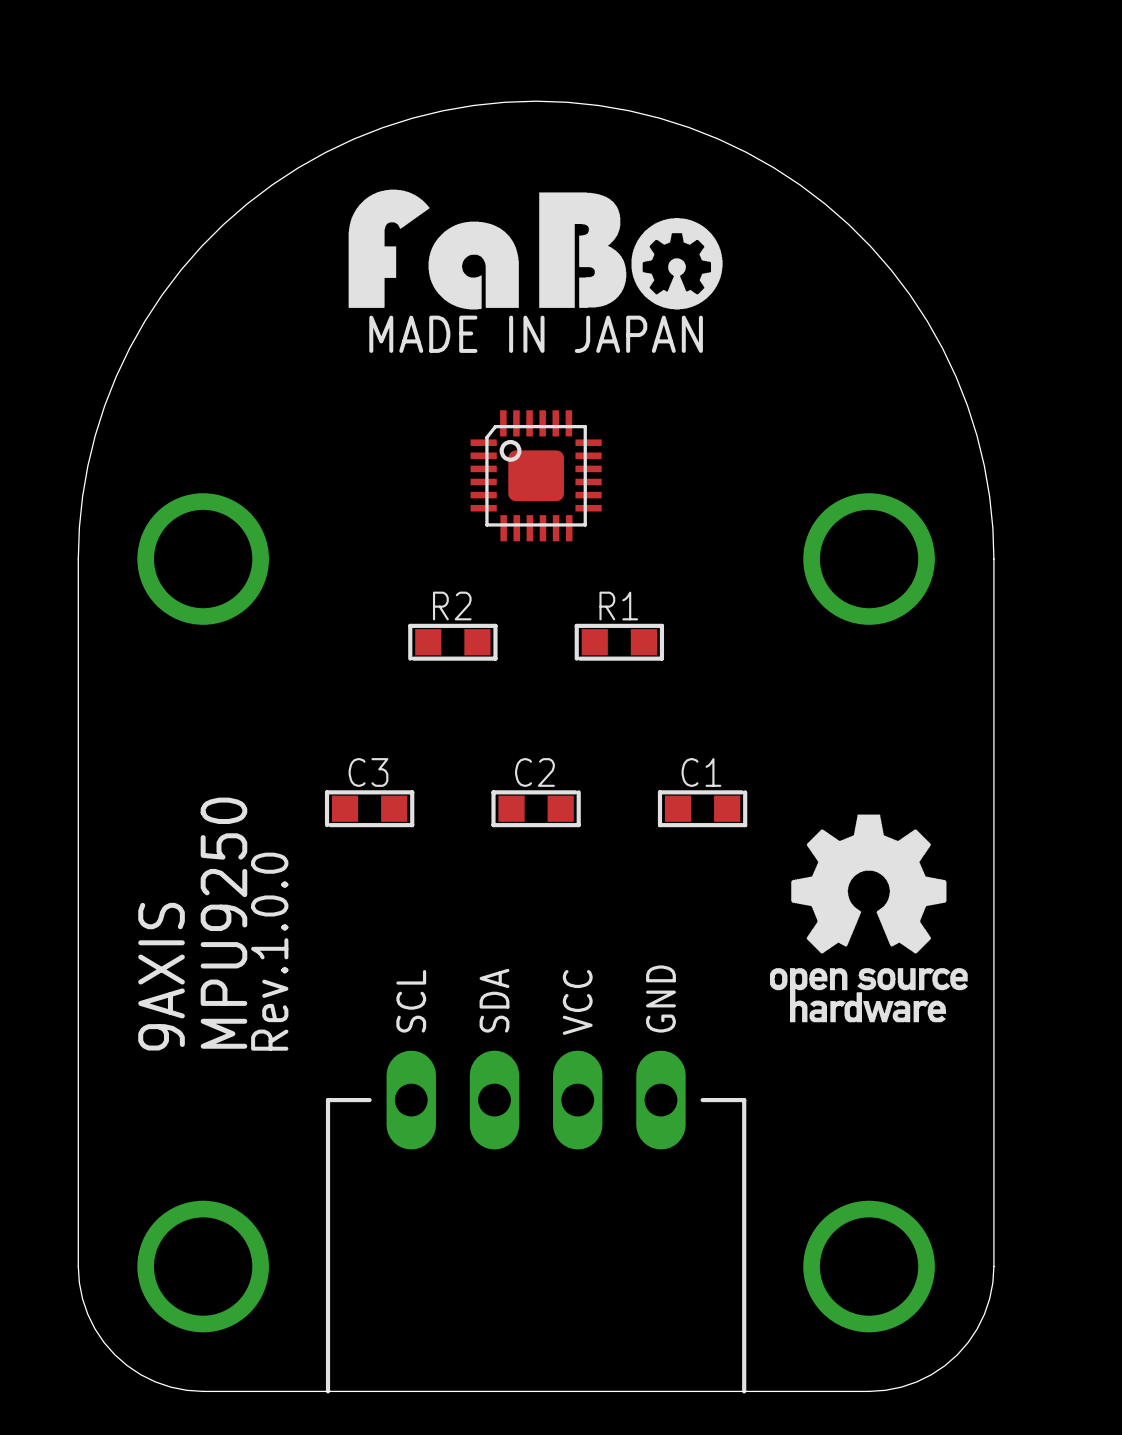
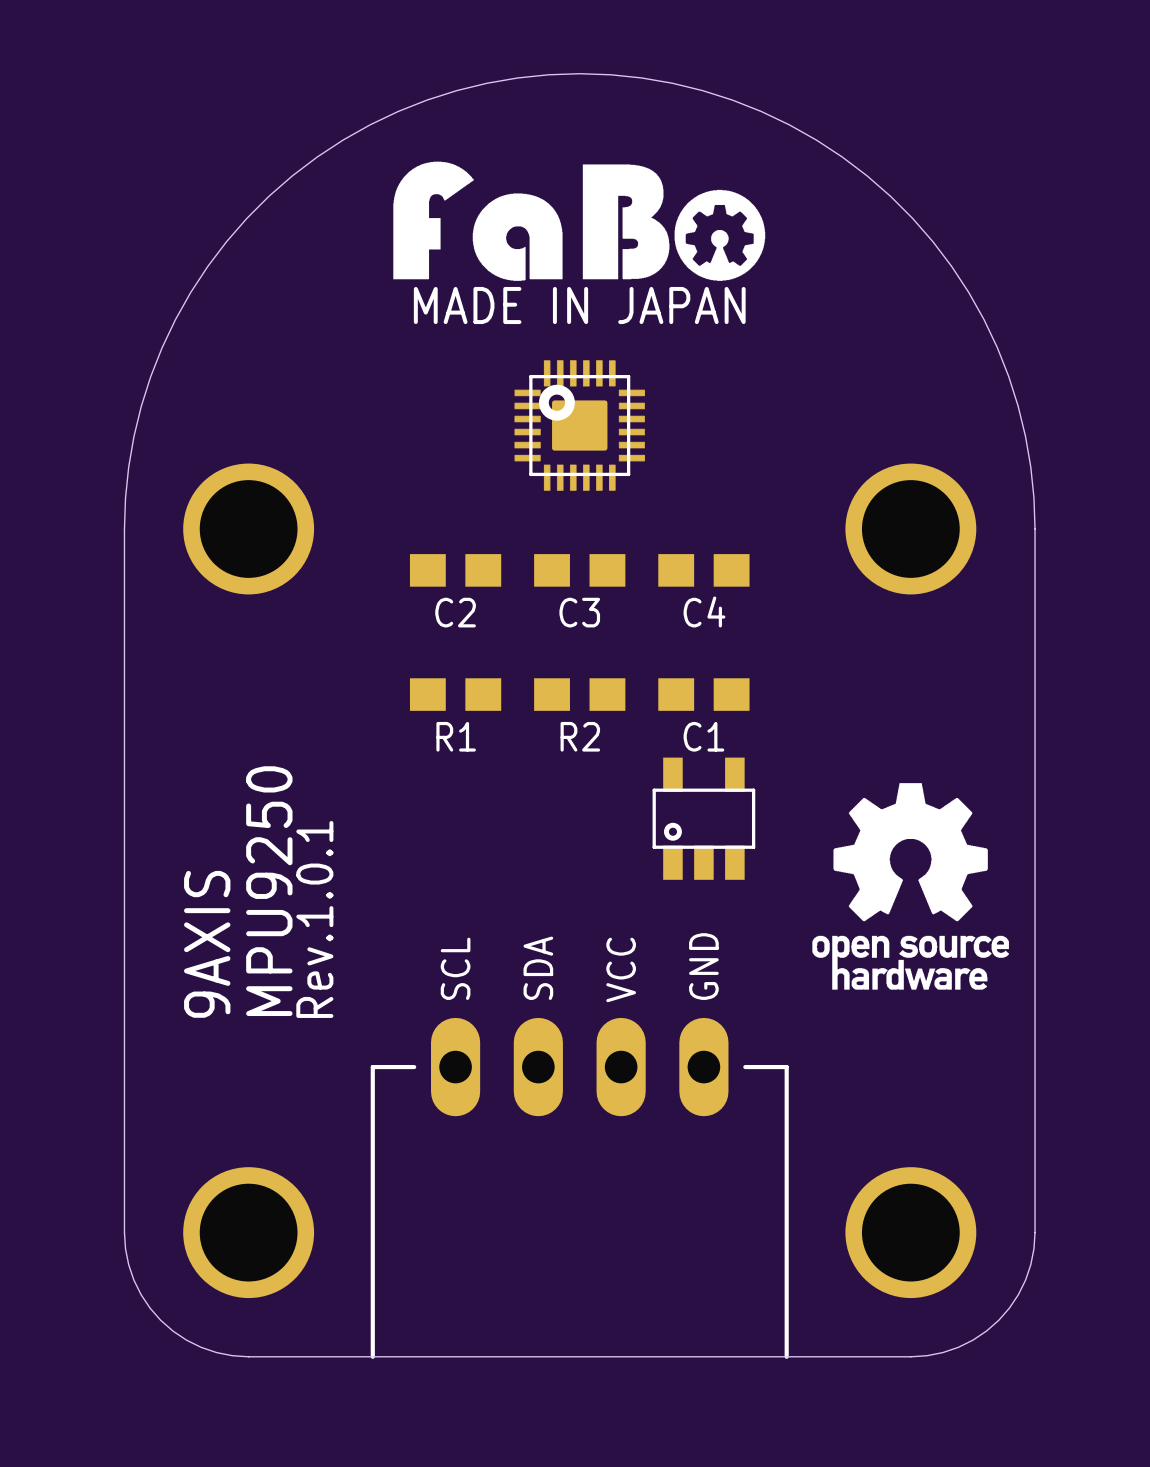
part footprint: [470, 410, 602, 542] -> [514, 360, 645, 491]
C4: none -> (703, 570)
R2 name position: R2 (452, 606) -> R2 (580, 736)
R1 name position: R1 (618, 606) -> R1 (456, 736)
R2 footprint: [408, 623, 498, 661] -> [534, 678, 626, 711]
R1 footprint: [574, 623, 665, 661] -> [409, 678, 502, 711]
C3 name position: C3 (368, 772) -> C3 (579, 612)
C2 name position: C2 (534, 772) -> C2 (455, 612)
C1 name position: C1 (701, 772) -> C1 (703, 736)
C3 footprint: [324, 790, 415, 828] -> [534, 554, 626, 587]
C2 footprint: [491, 790, 581, 828] -> [409, 554, 502, 587]
C1 footprint: [657, 790, 748, 828] -> [658, 678, 750, 711]
part: none -> (703, 818)
text: Rev.1.0.0 (269, 951) -> Rev.1.0.1 (314, 919)

